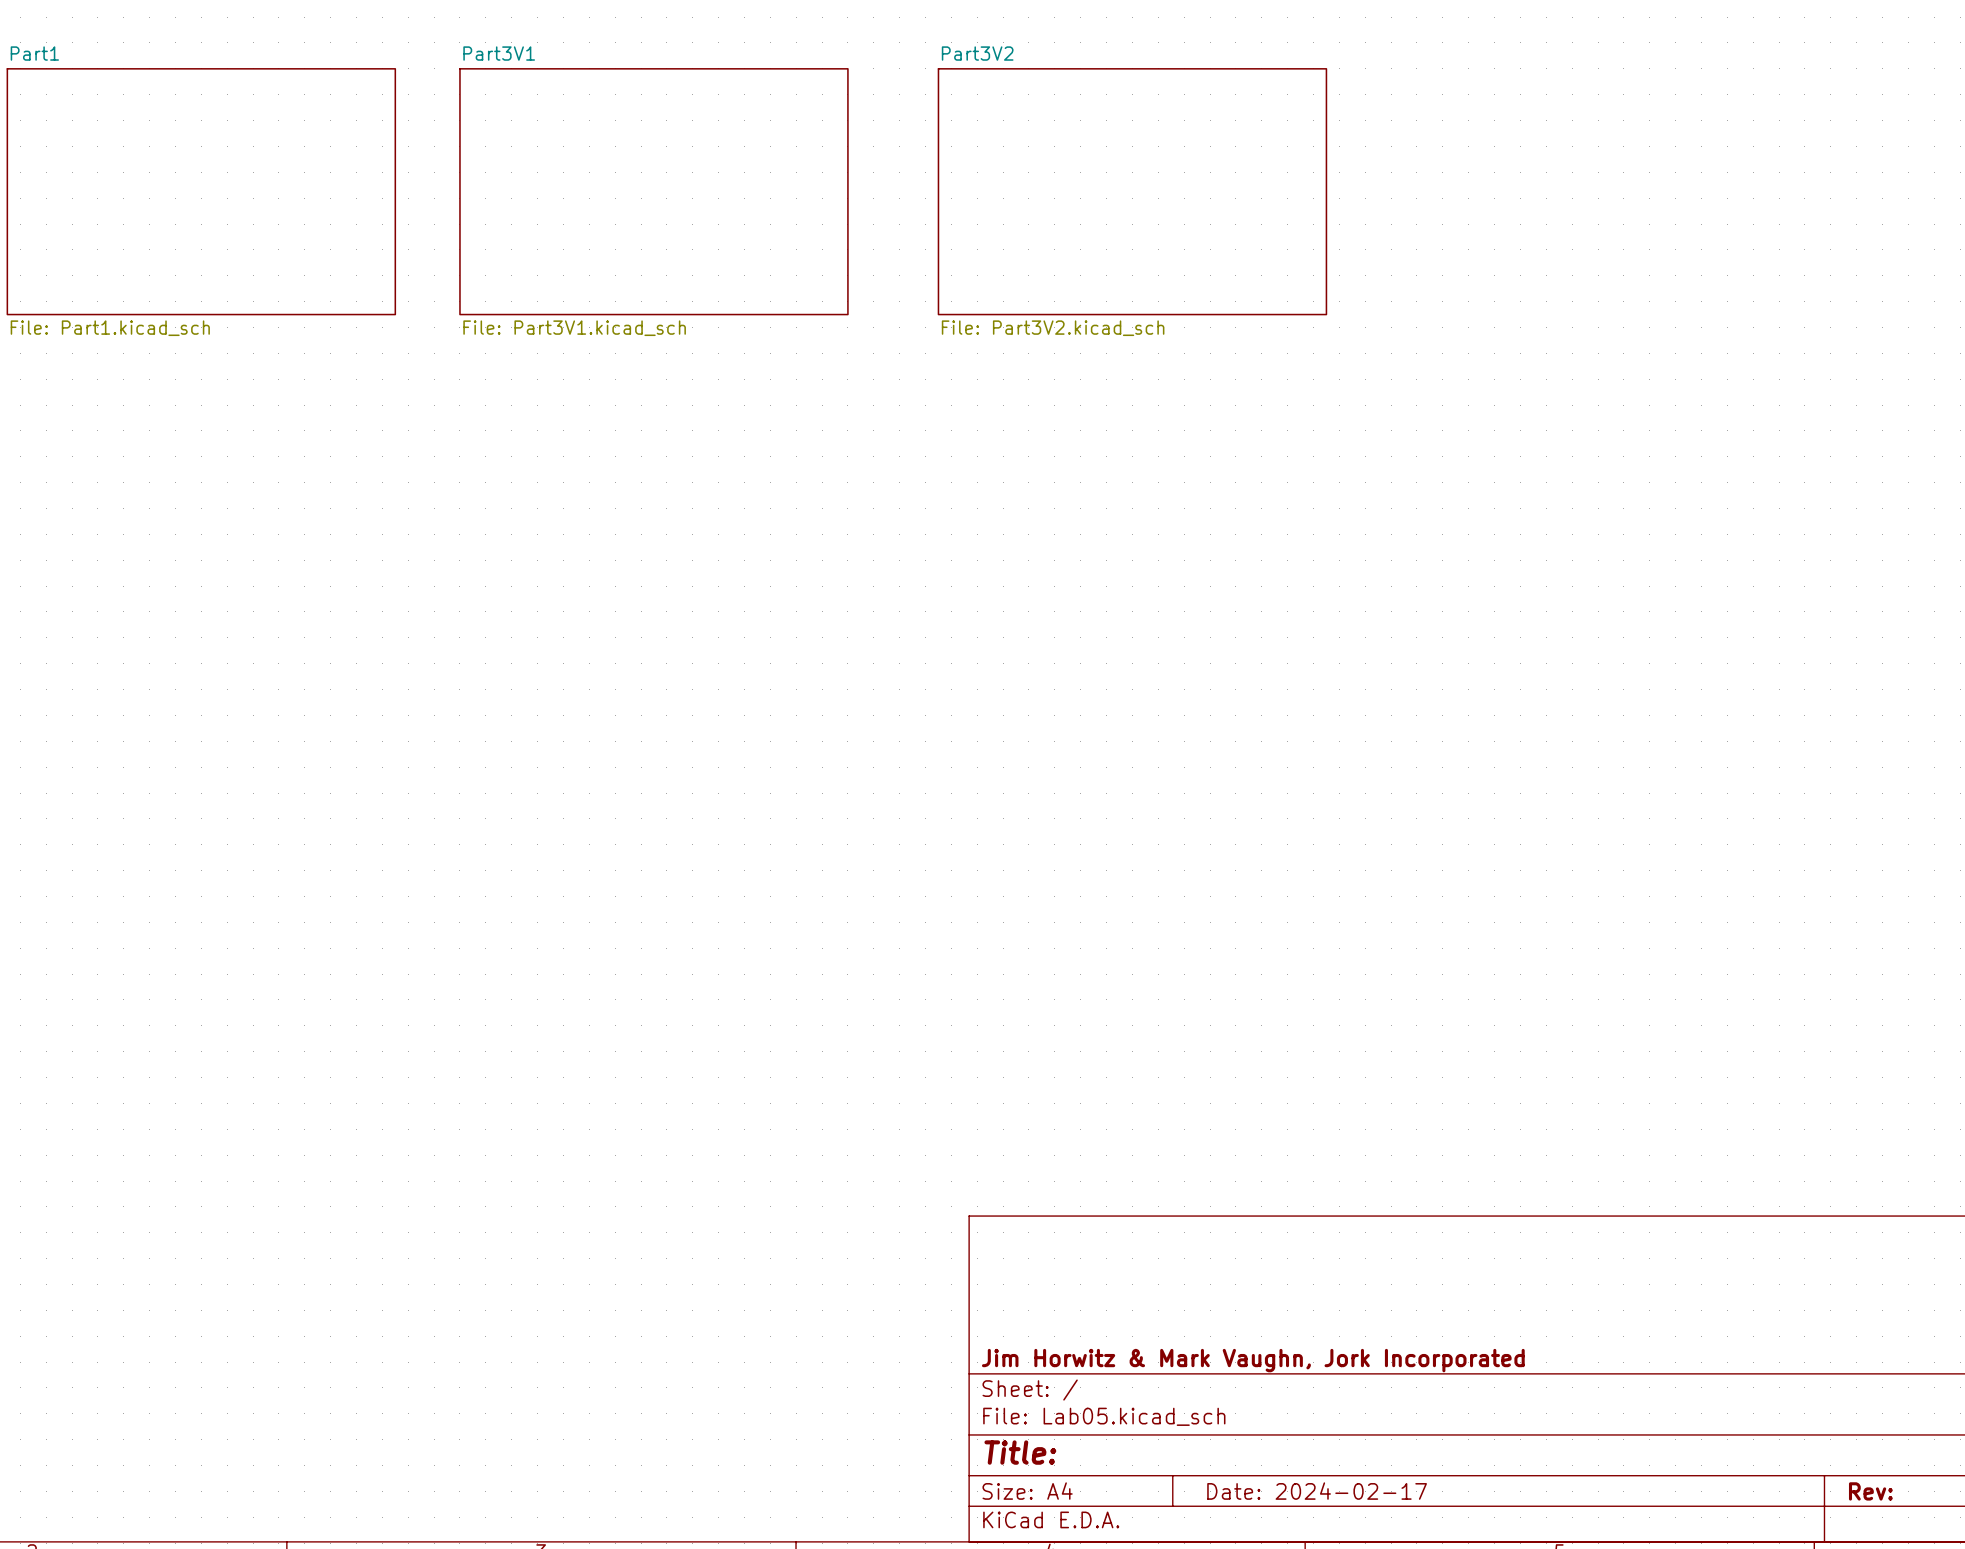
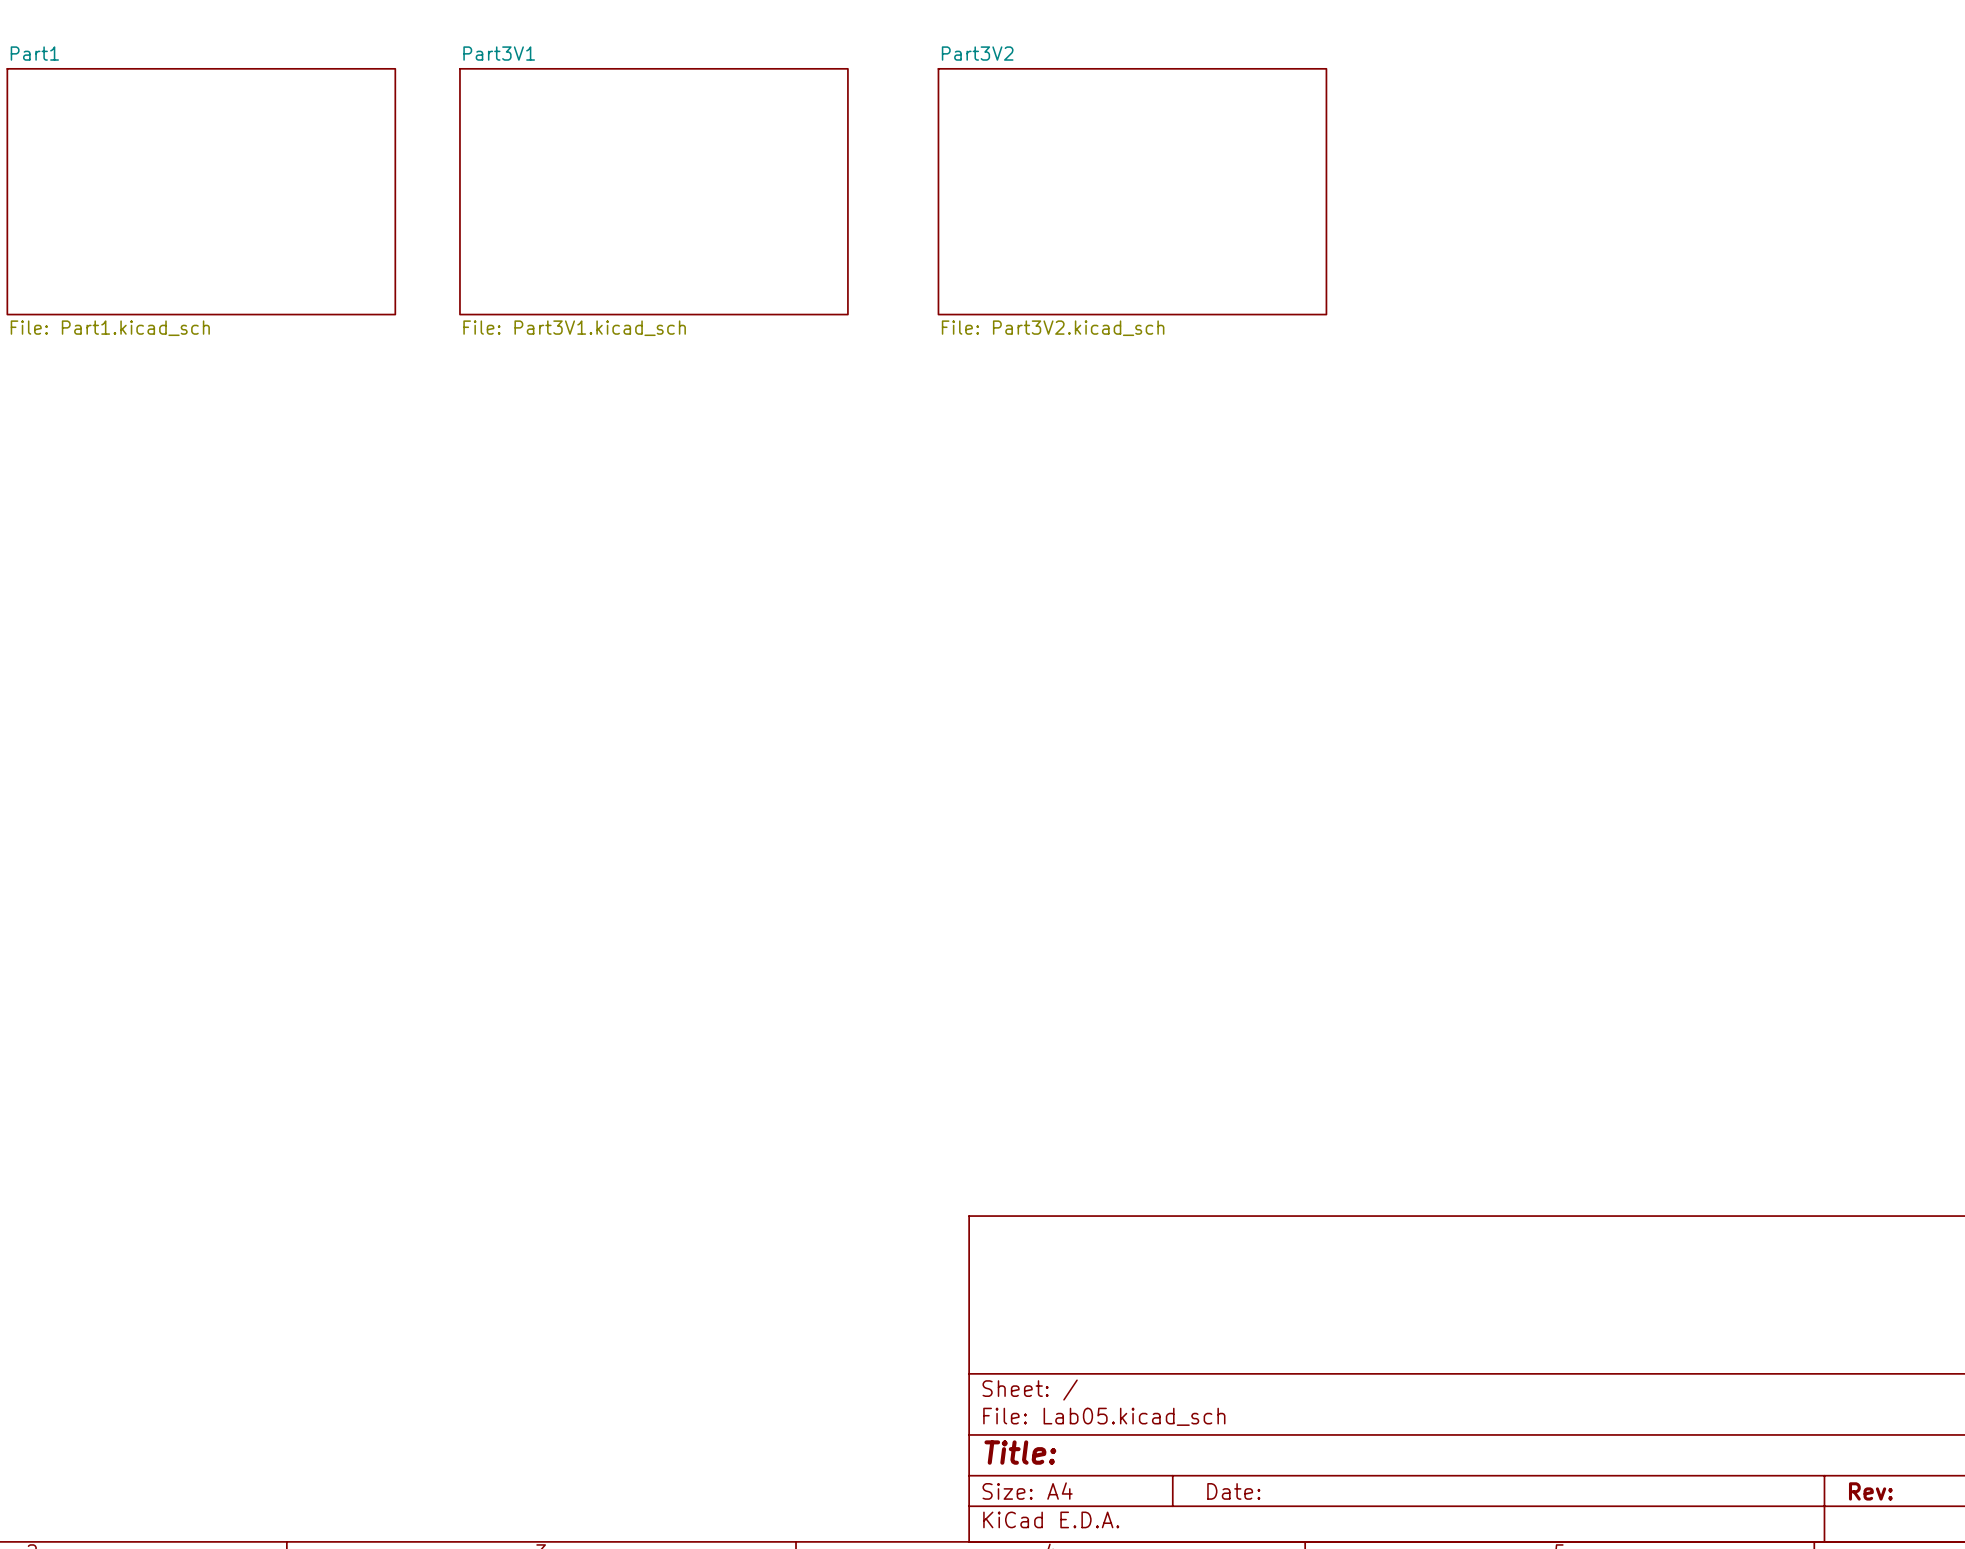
title block: Jim Horwitz & Mark Vaughn, Jork Incorporated (1253, 1360) -> none
title block: Date: 2024-02-17 (1317, 1491) -> Date: (1233, 1491)

